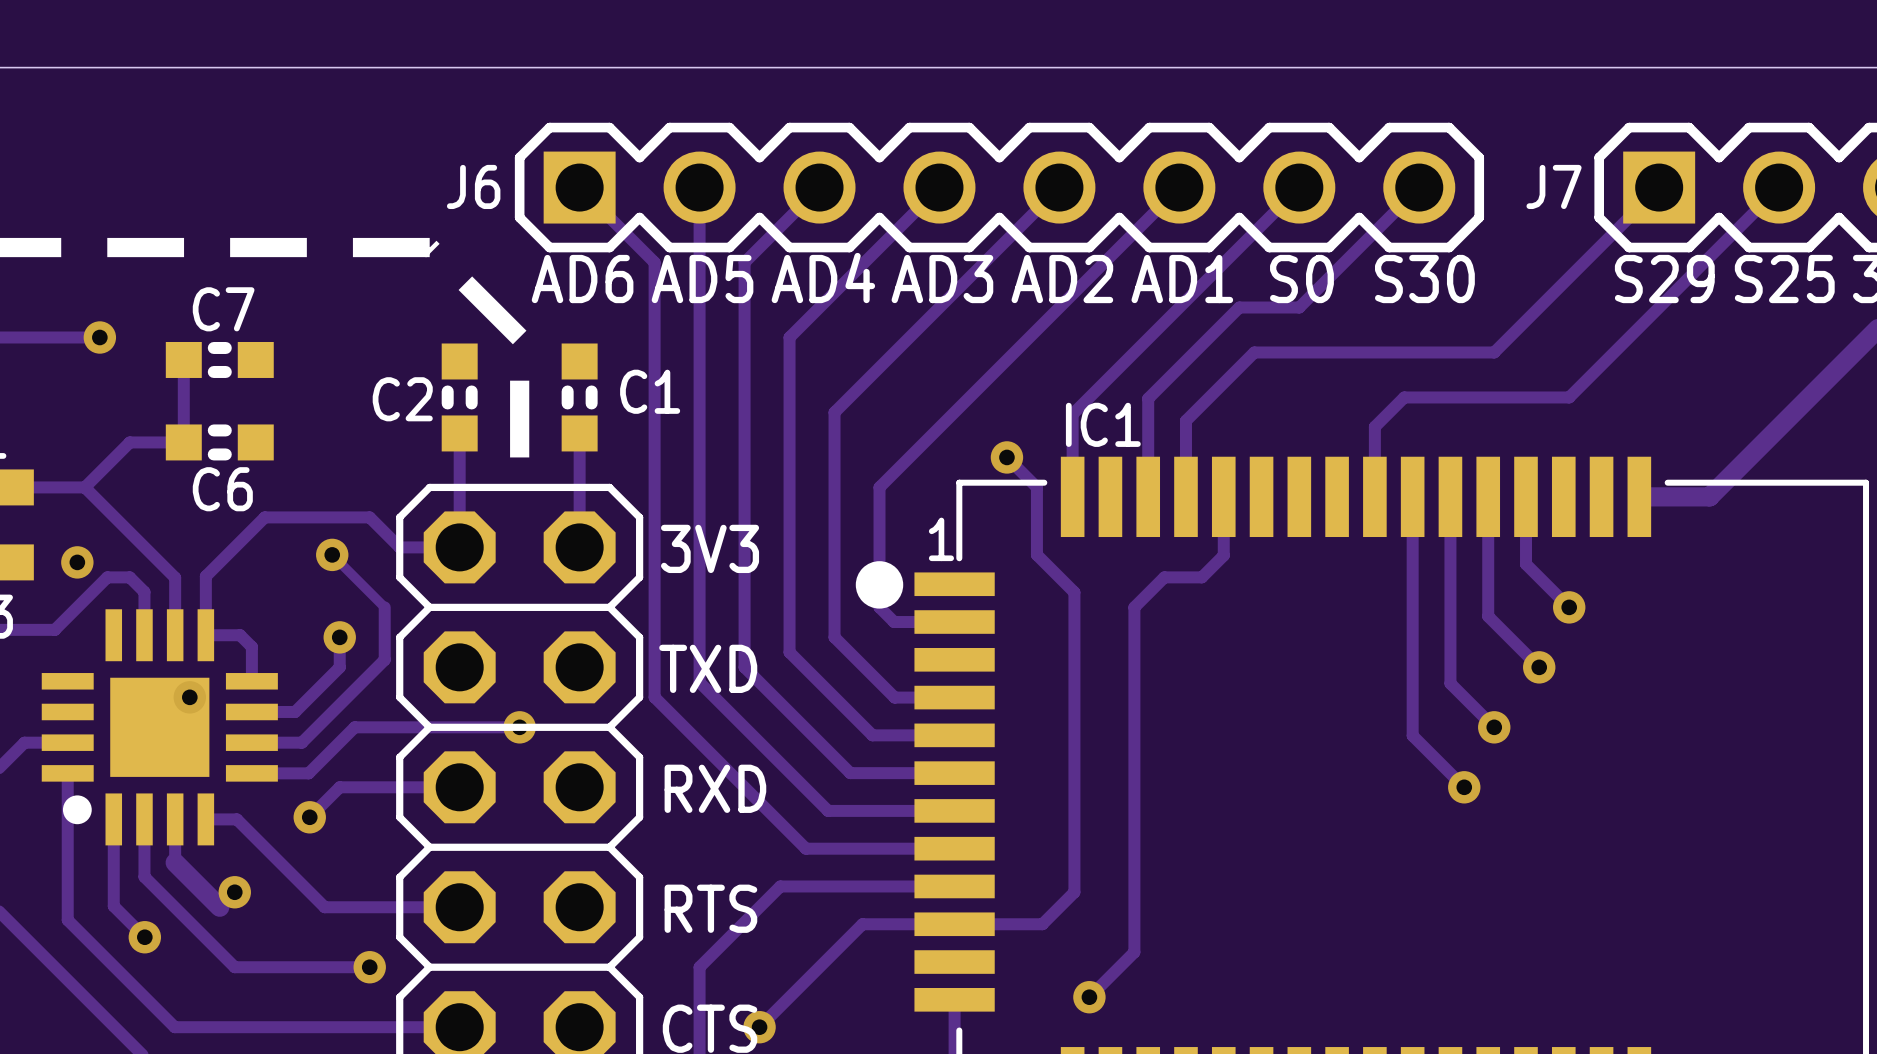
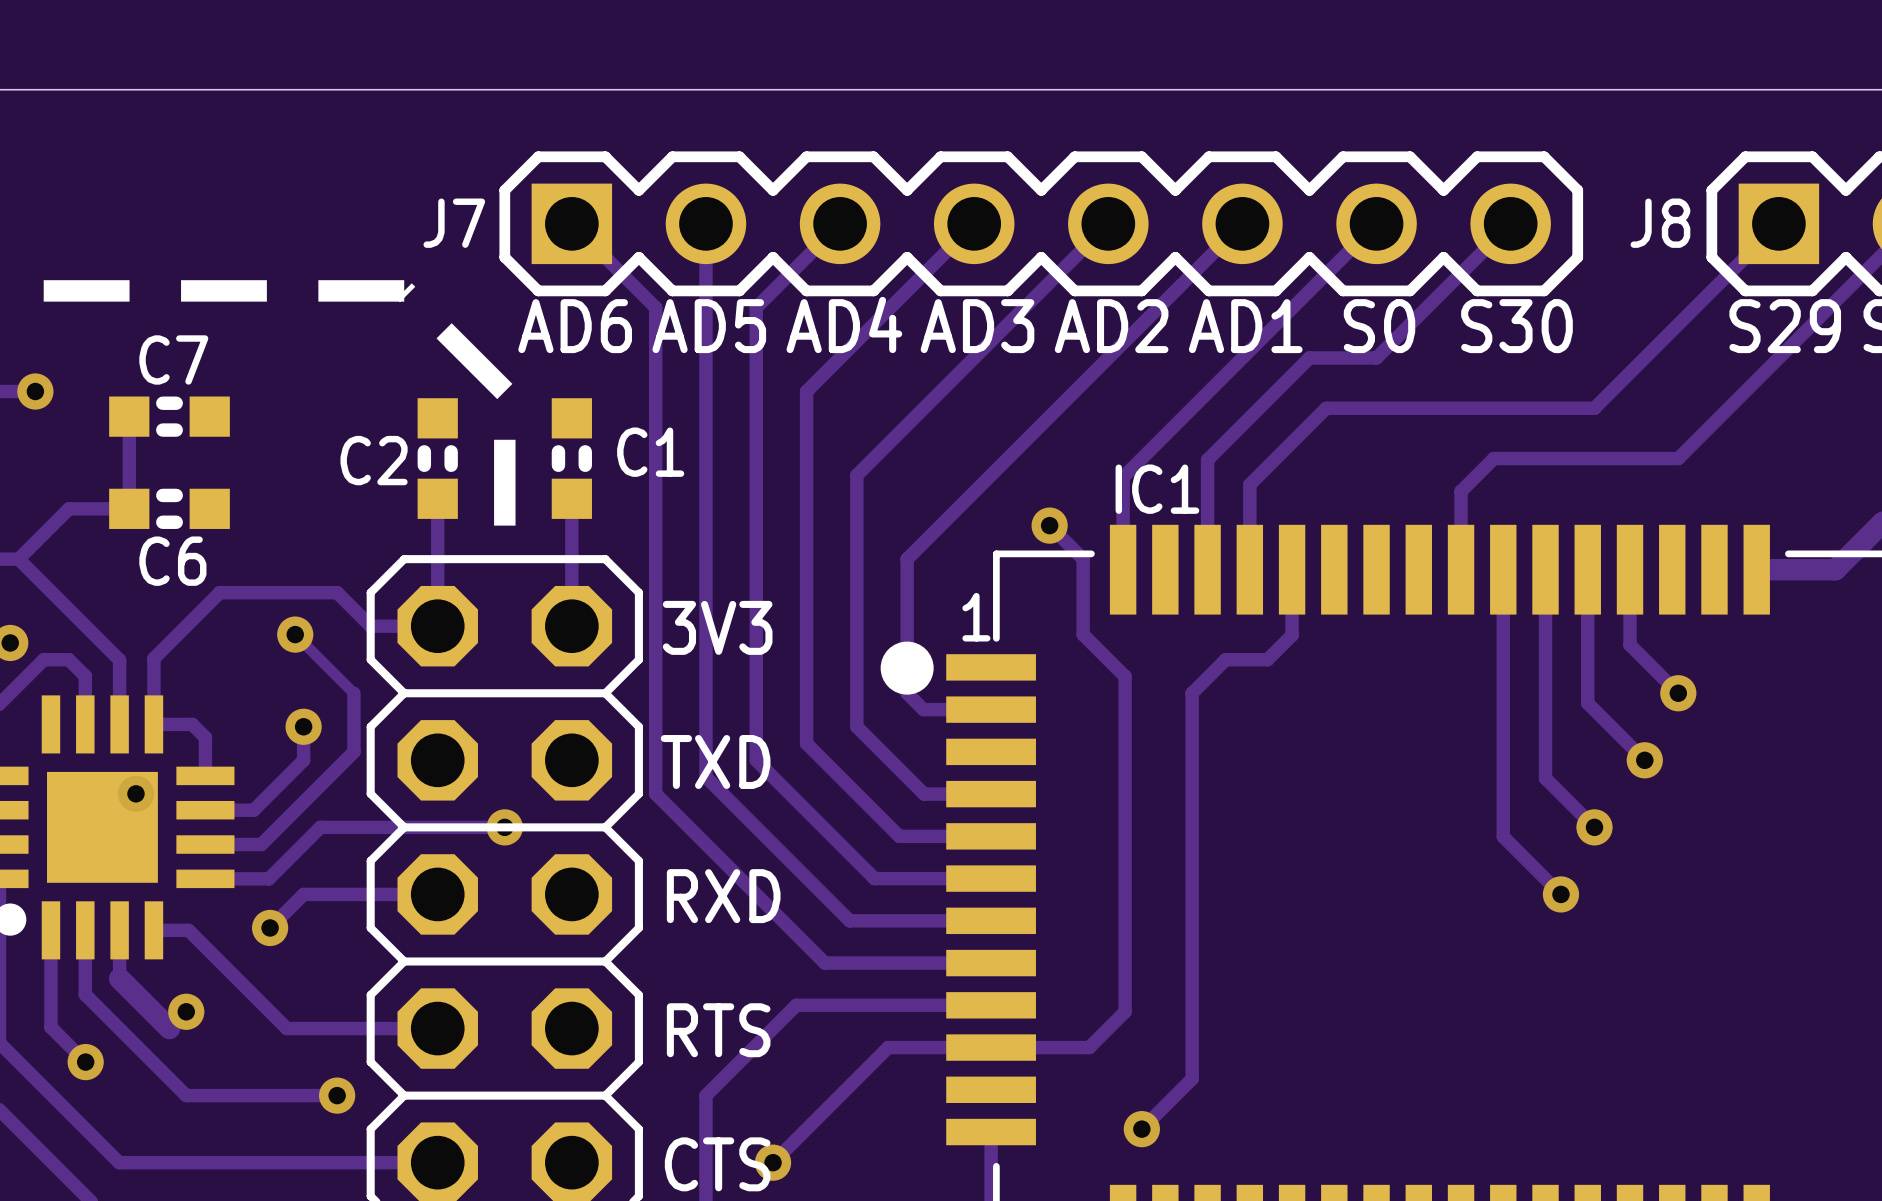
J6 name: J6 (473, 186) -> J7 (454, 223)
J7 name: J7 (1554, 186) -> J8 (1660, 223)

